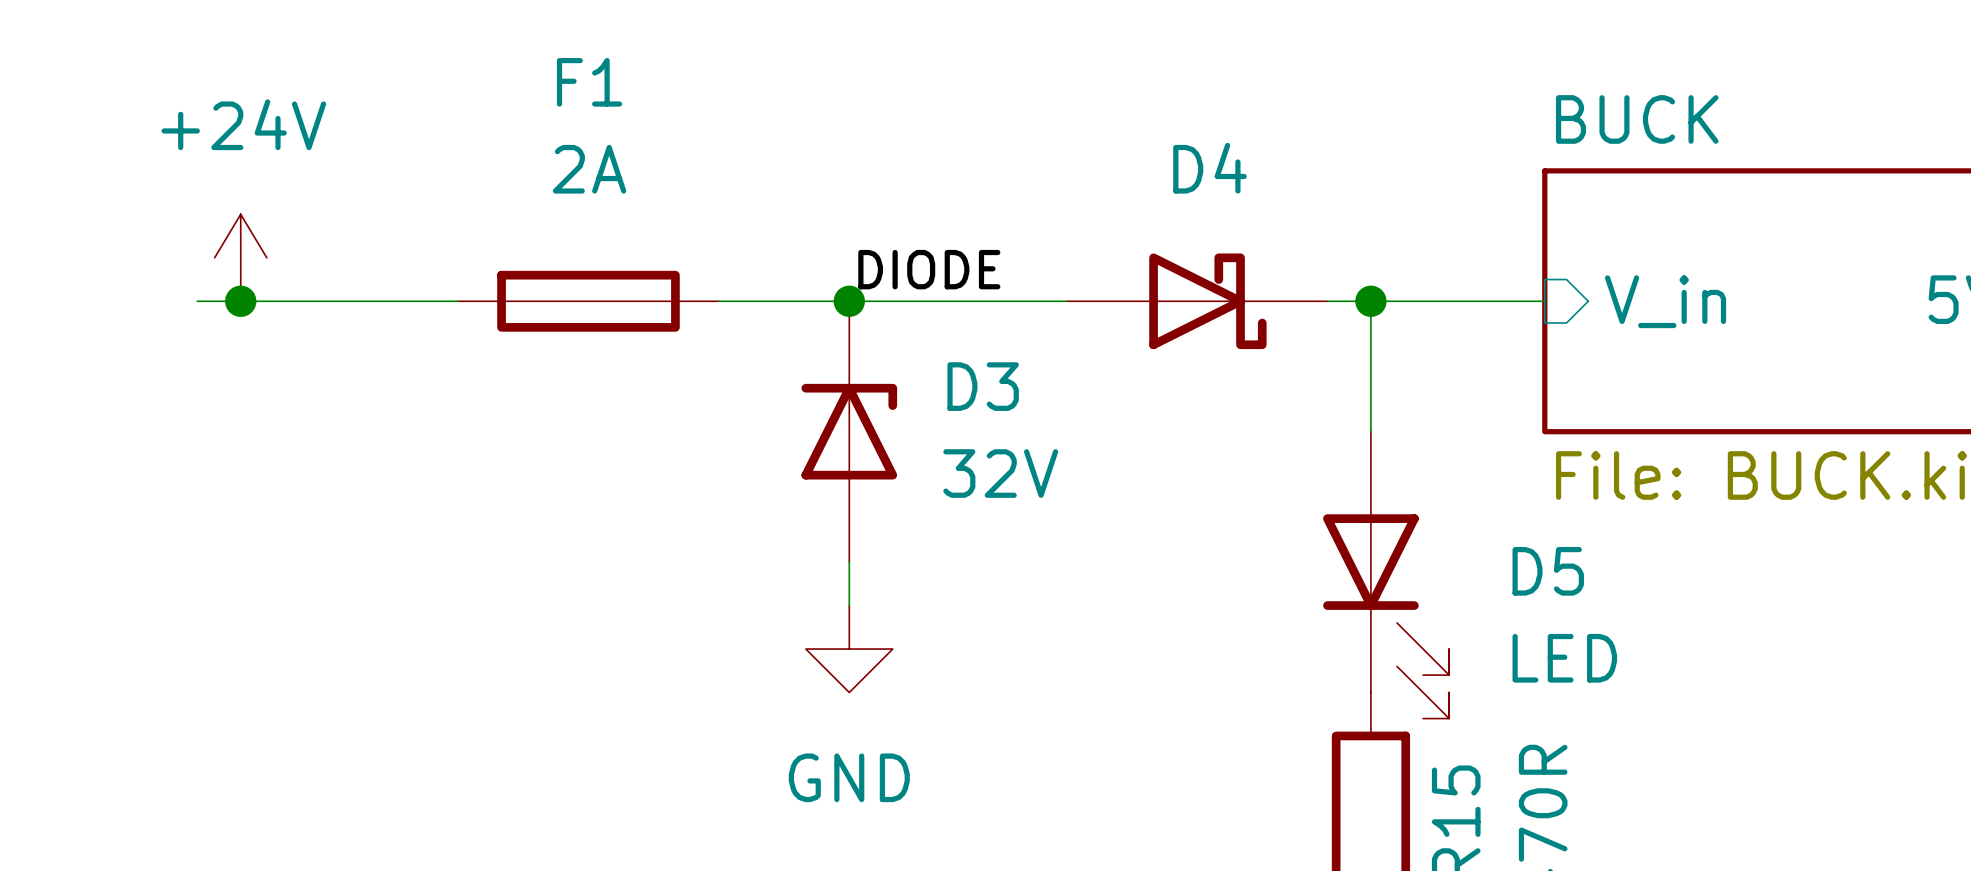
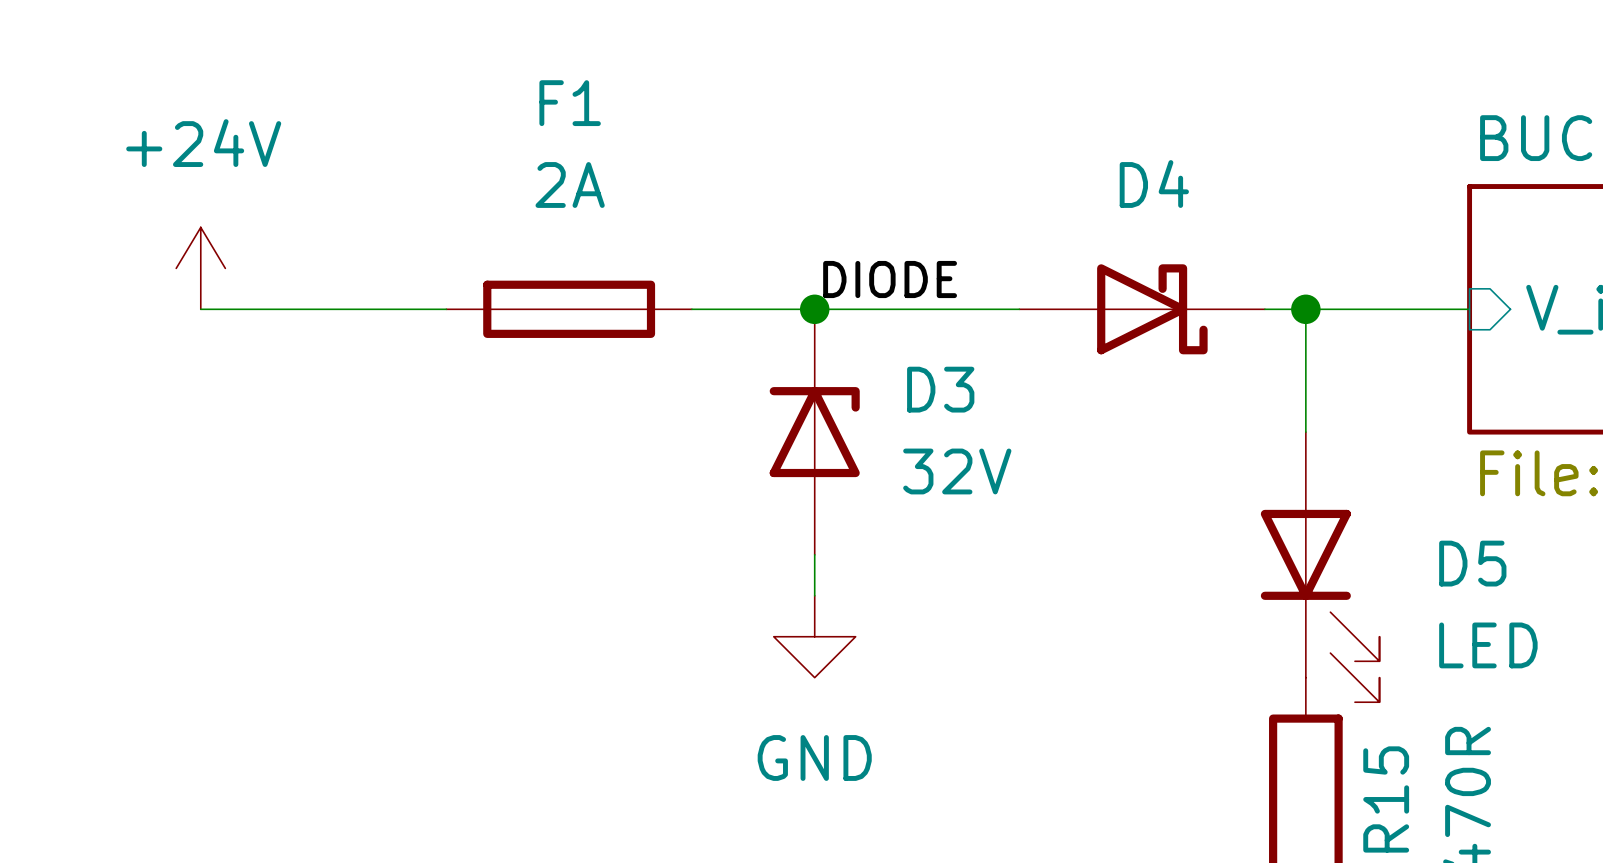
power symbol position: +24V (240, 257) -> +24V (200, 268)
junction: (240, 301) -> none

